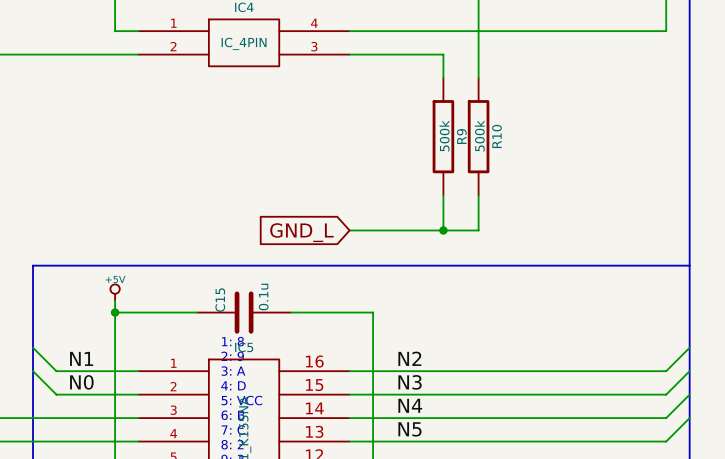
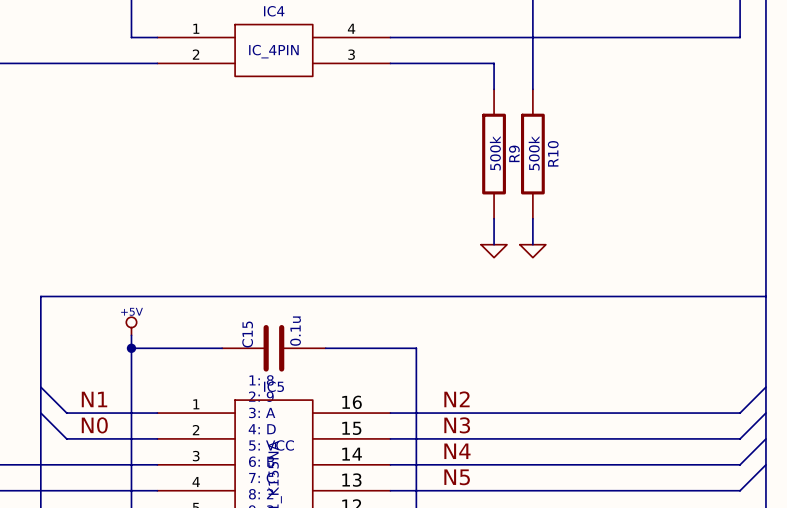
wire: (443, 218) (443, 230) -> none
wire: (478, 218) (478, 230) (349, 230) -> none
power symbol: none -> (494, 251)
power symbol: none -> (532, 251)
junction: (443, 230) -> none
global label: GND_L (301, 232) -> none

